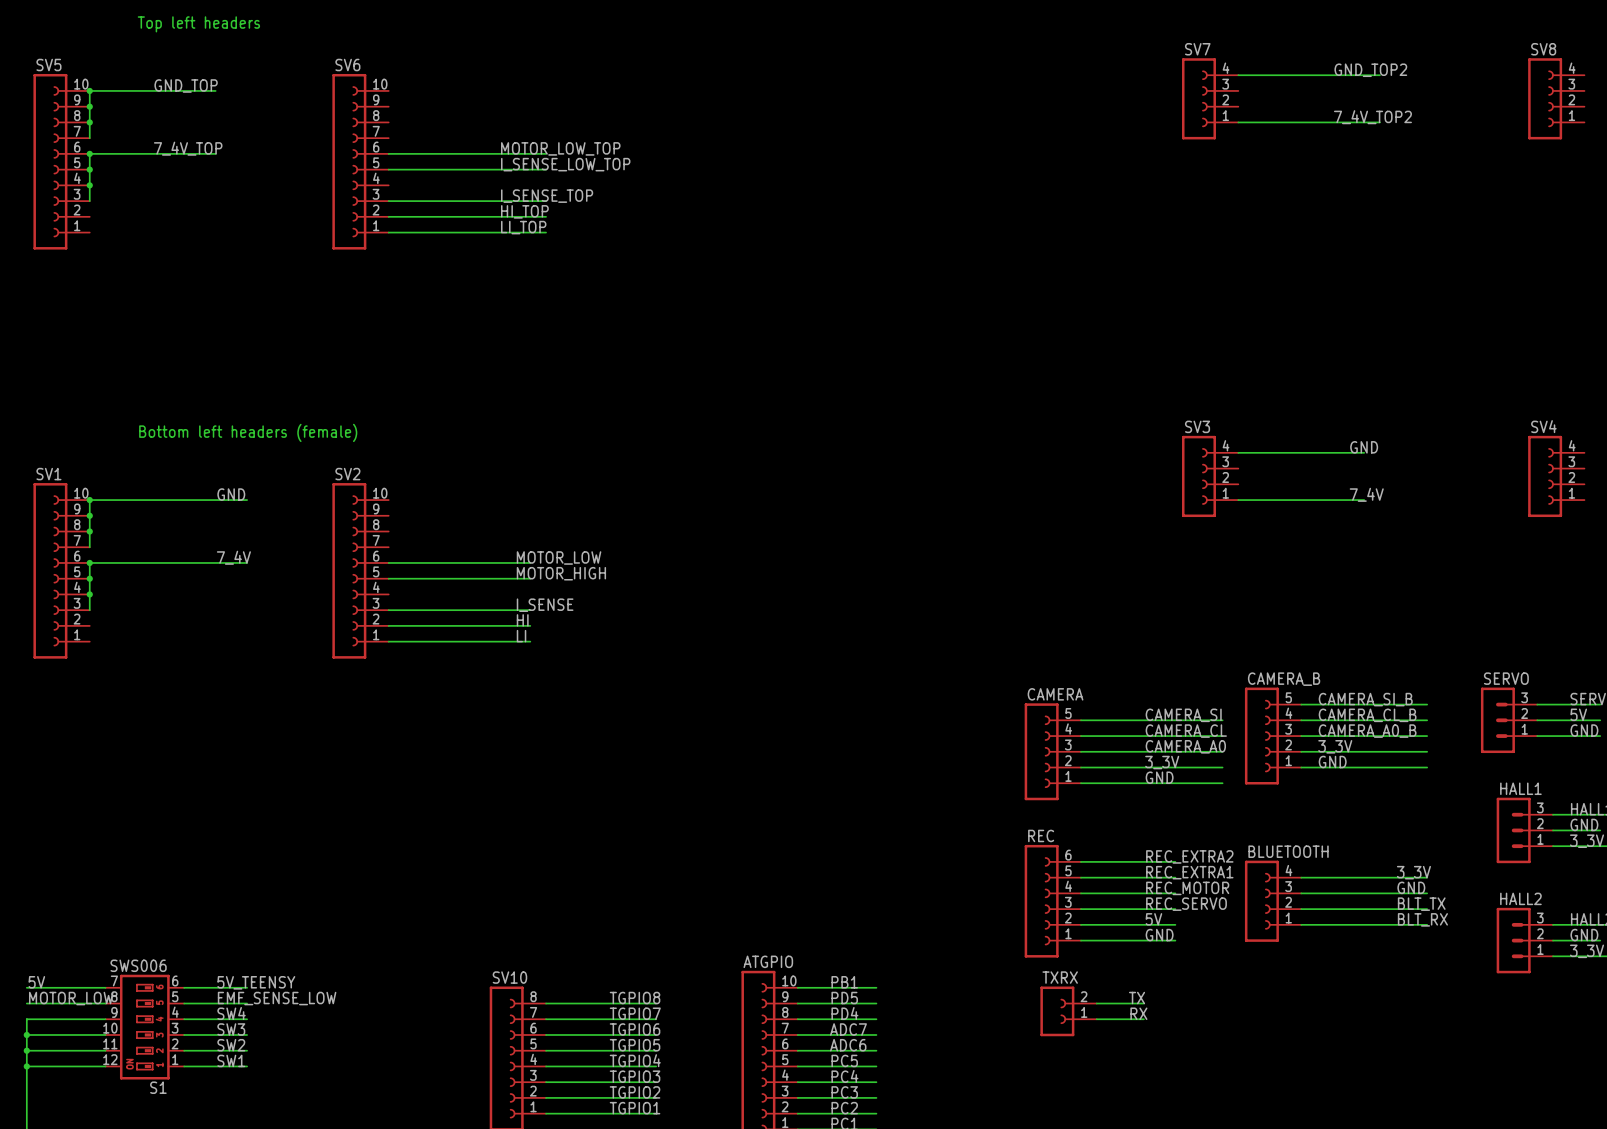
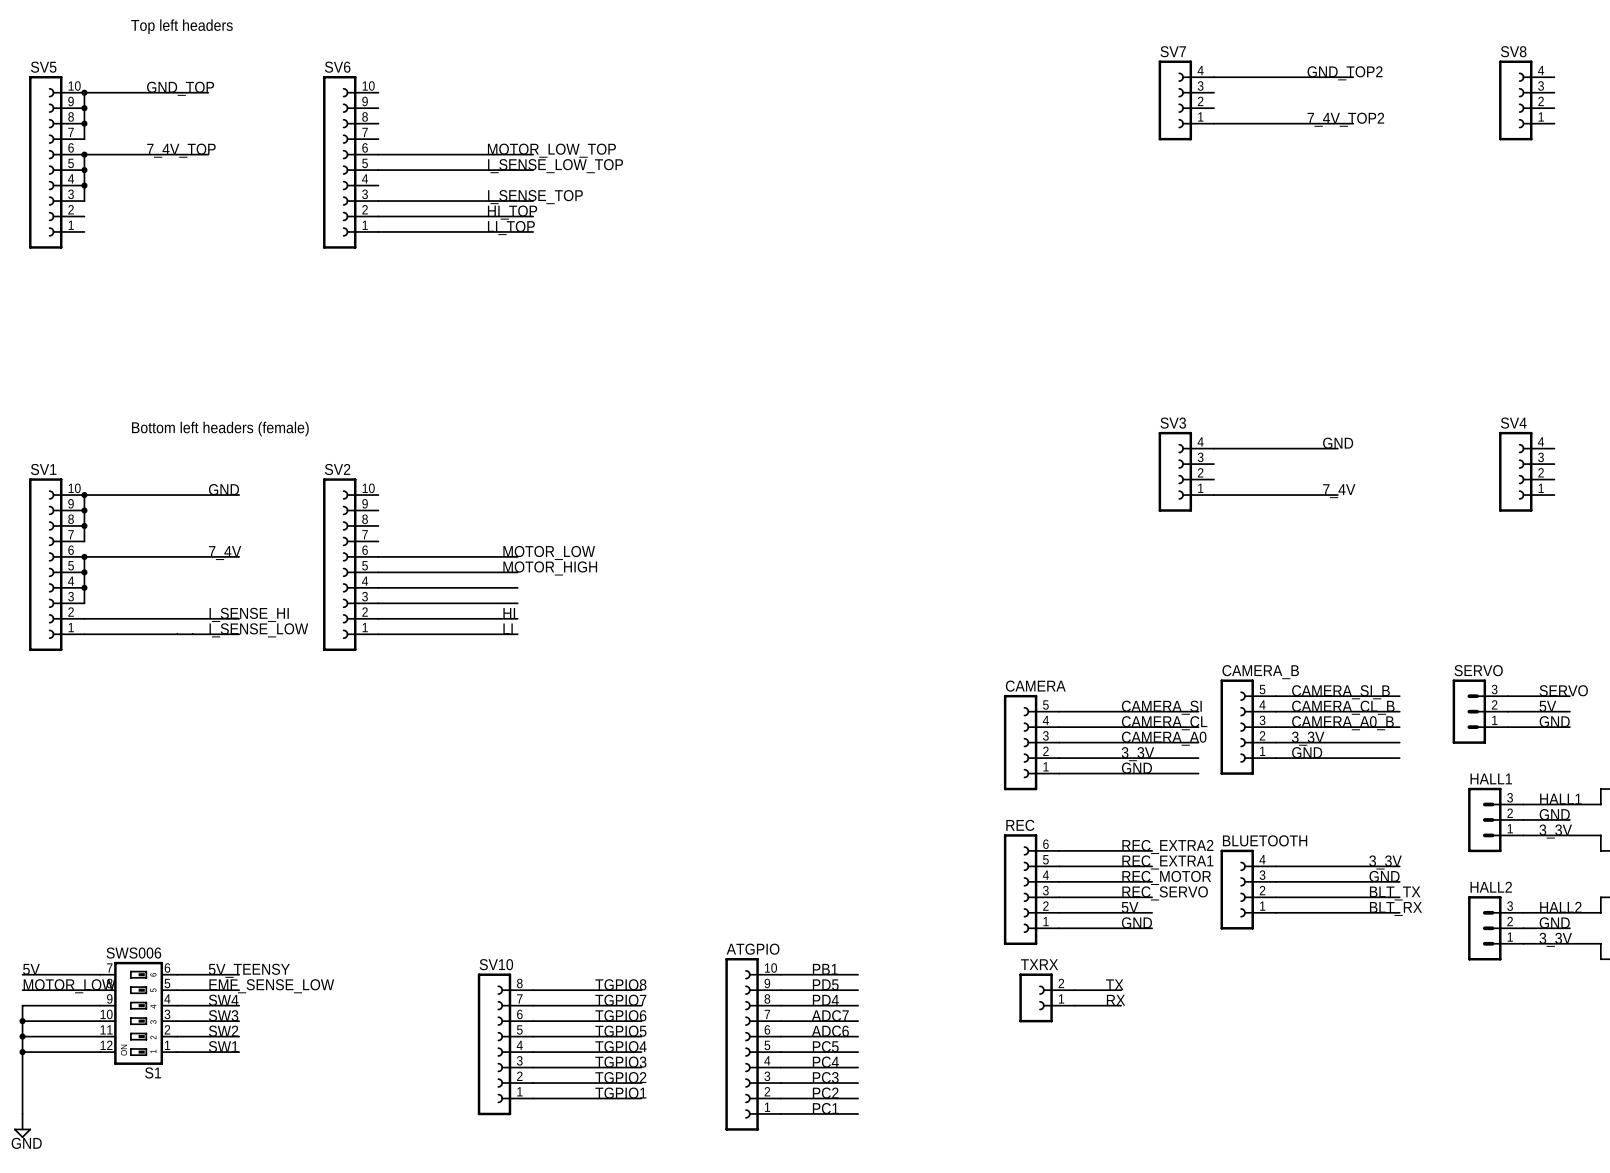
wire: none -> (378, 587) (517, 587)
label: I_SENSE (545, 605) -> none
label: none -> I_SENSE_HI (249, 614)
wire: none -> (84, 618) (239, 618)
label: none -> I_SENSE_LOW (258, 630)
wire: none -> (84, 634) (239, 634)

